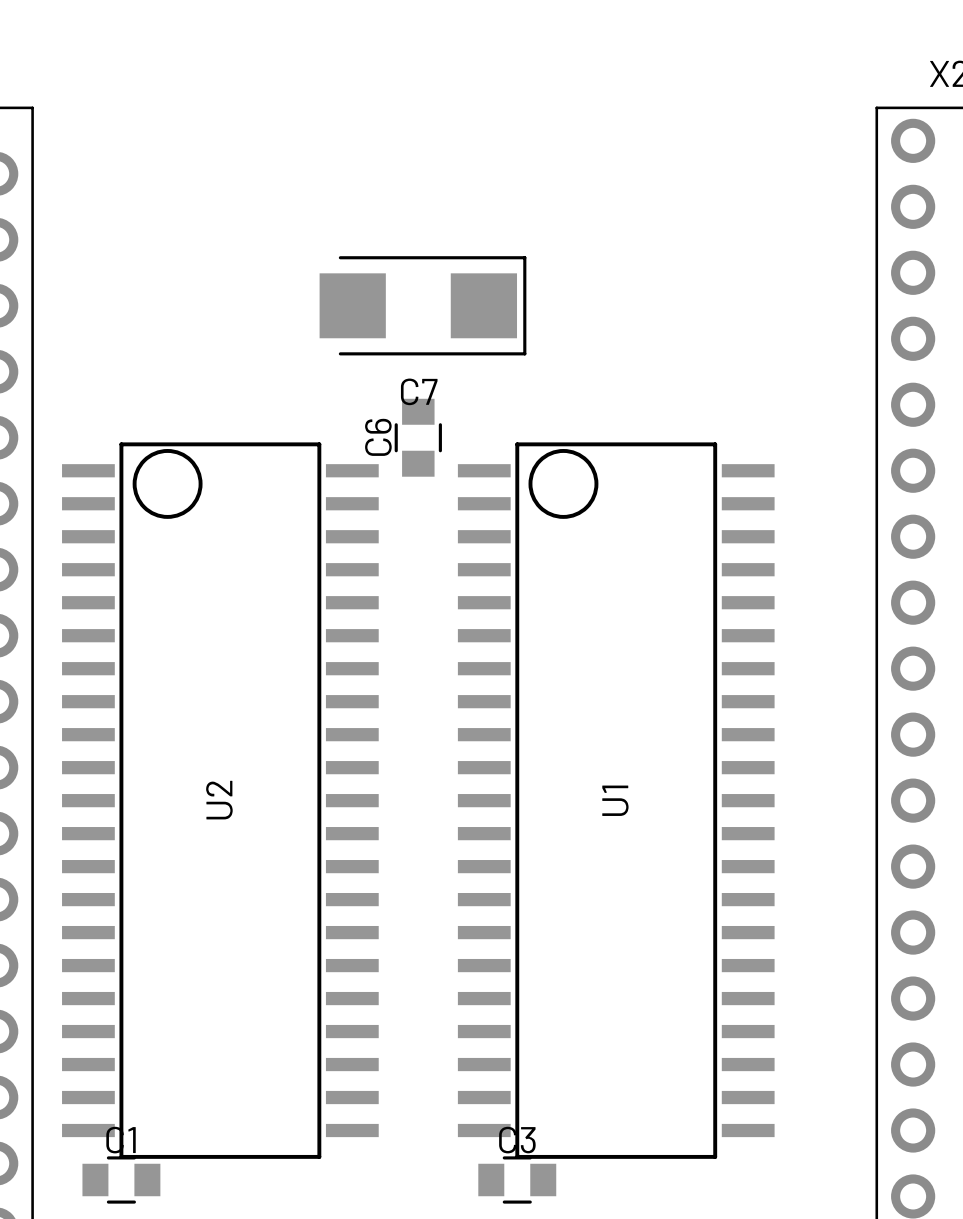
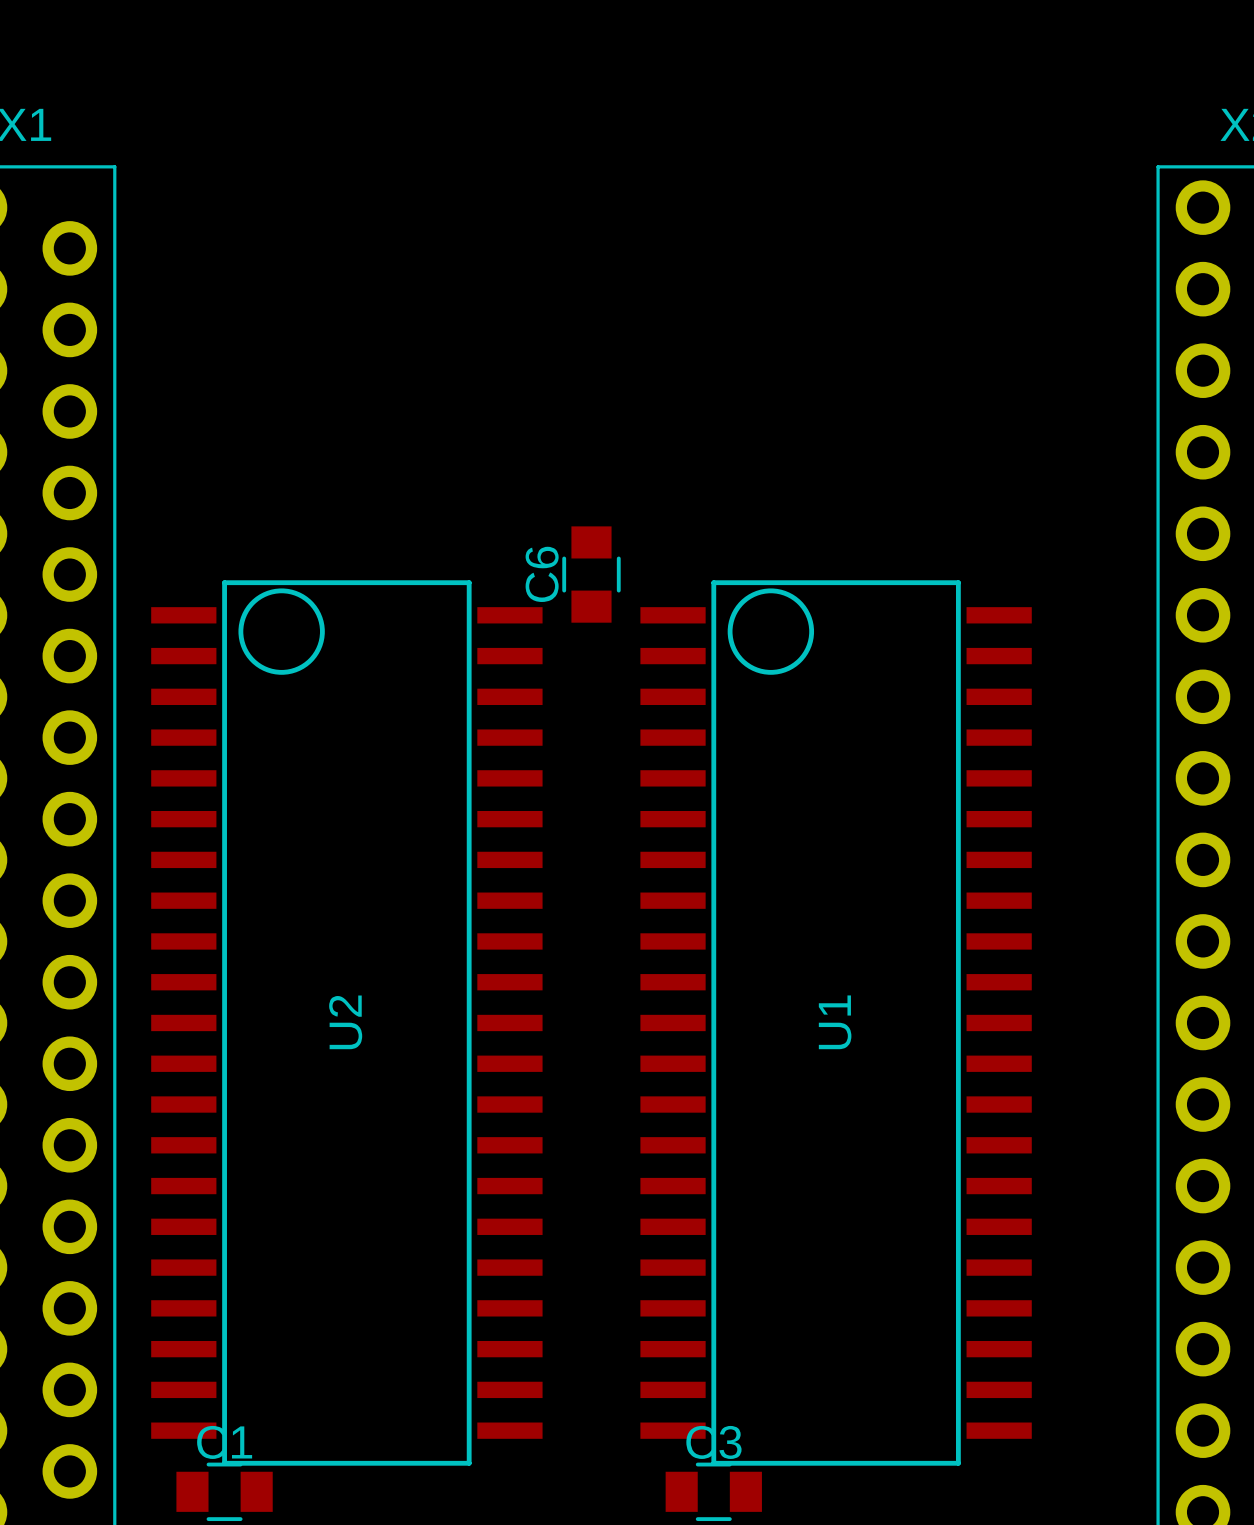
C7: (422, 305) -> none

